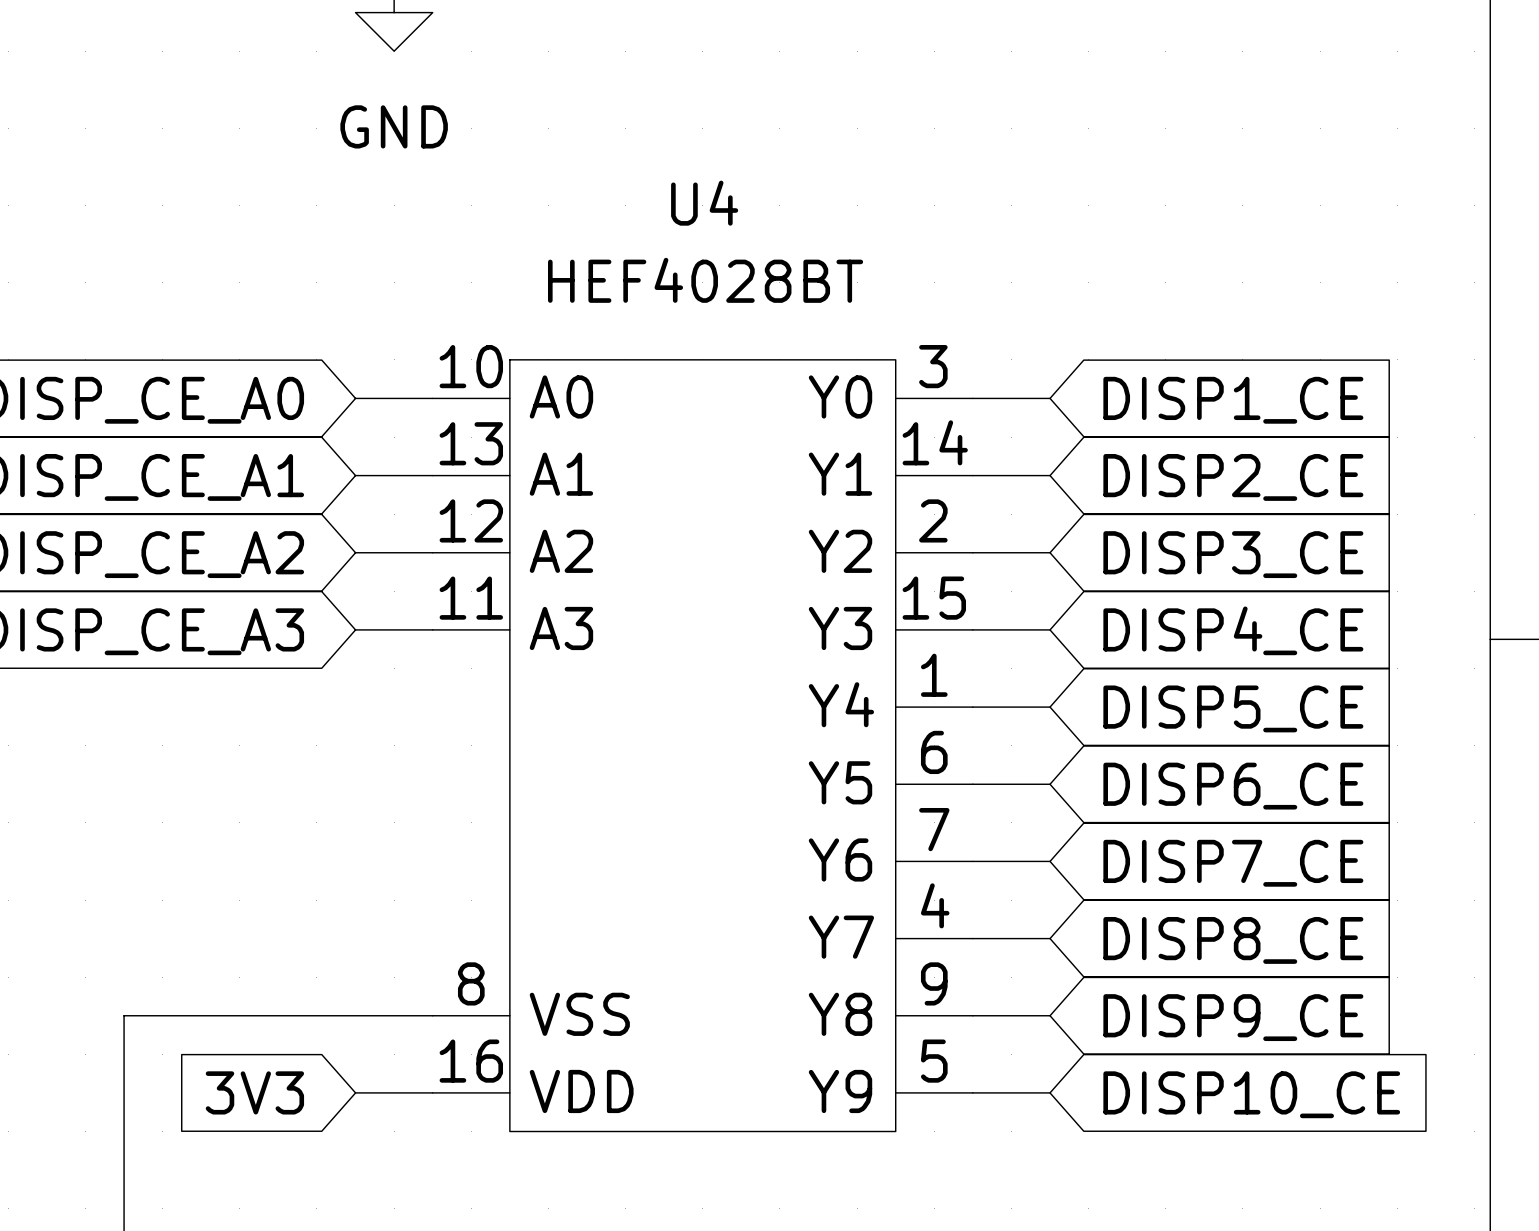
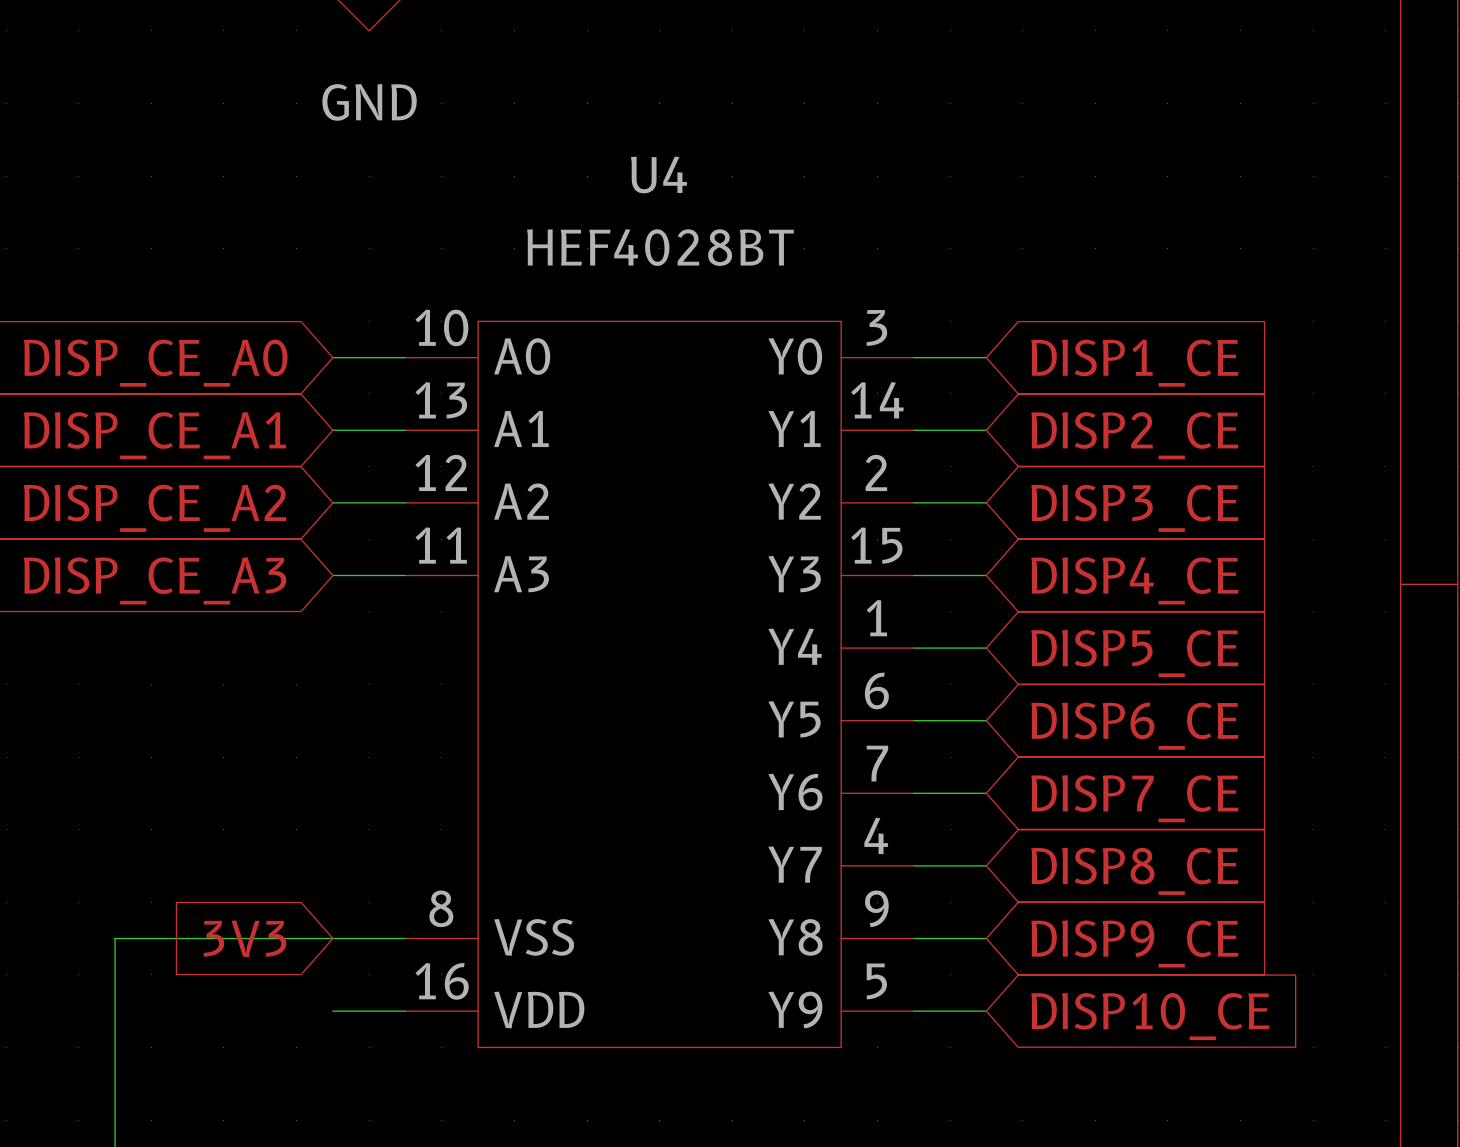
global label position: 3V3 (254, 1092) -> 3V3 (244, 938)

